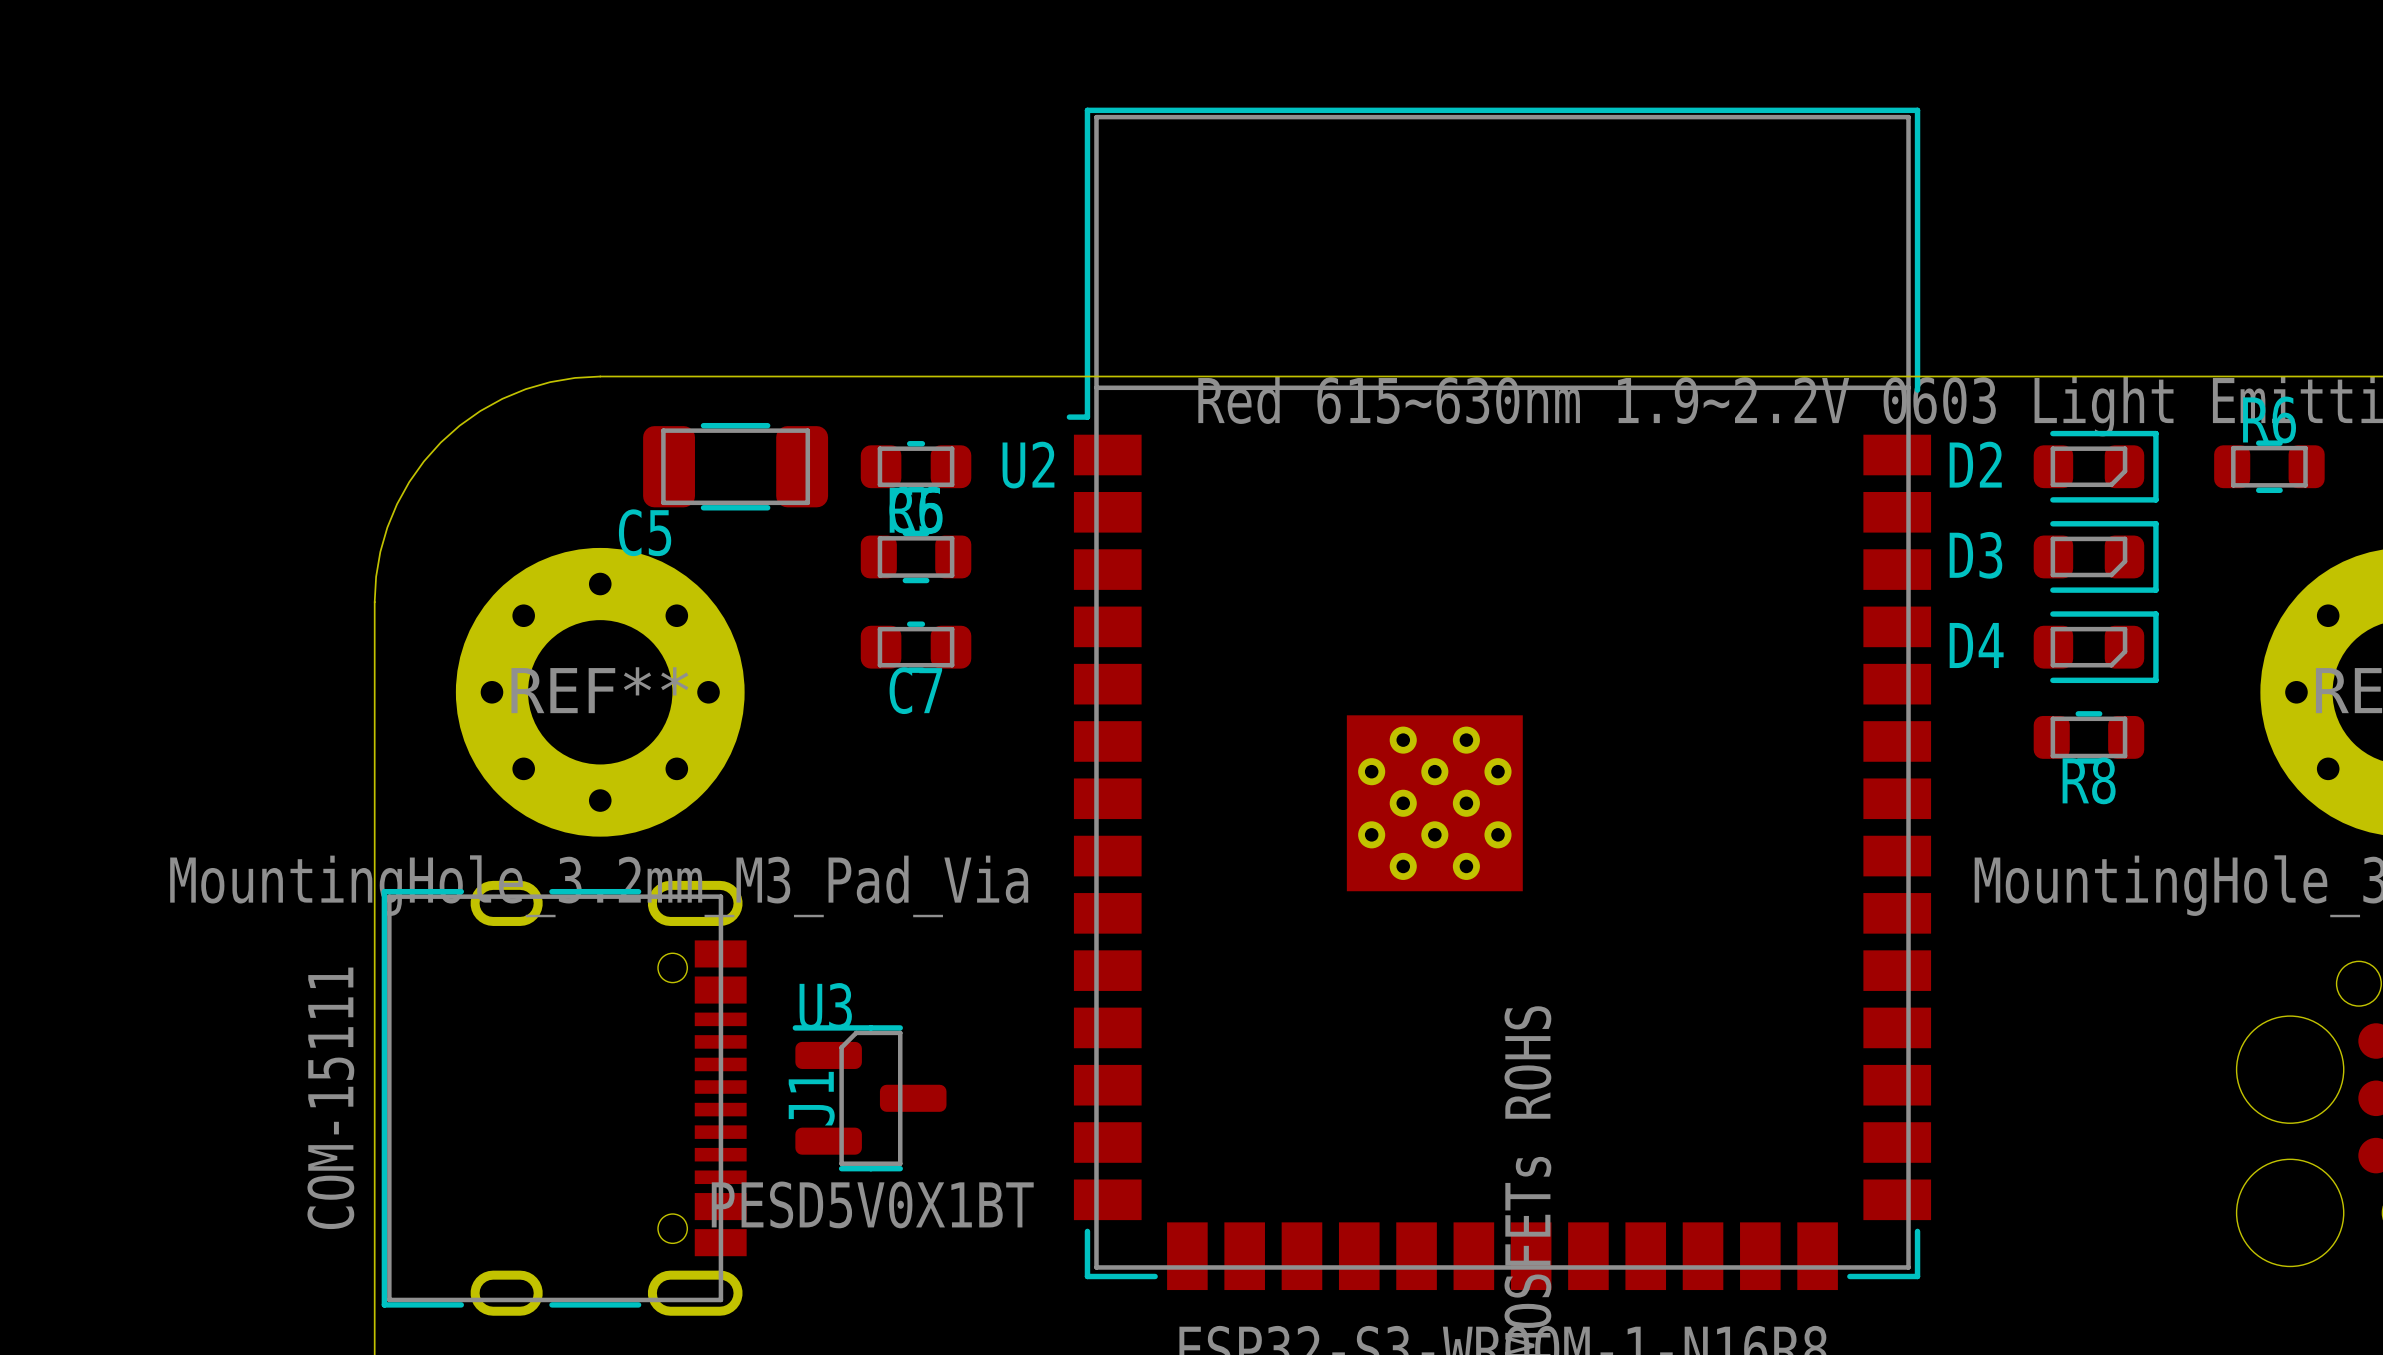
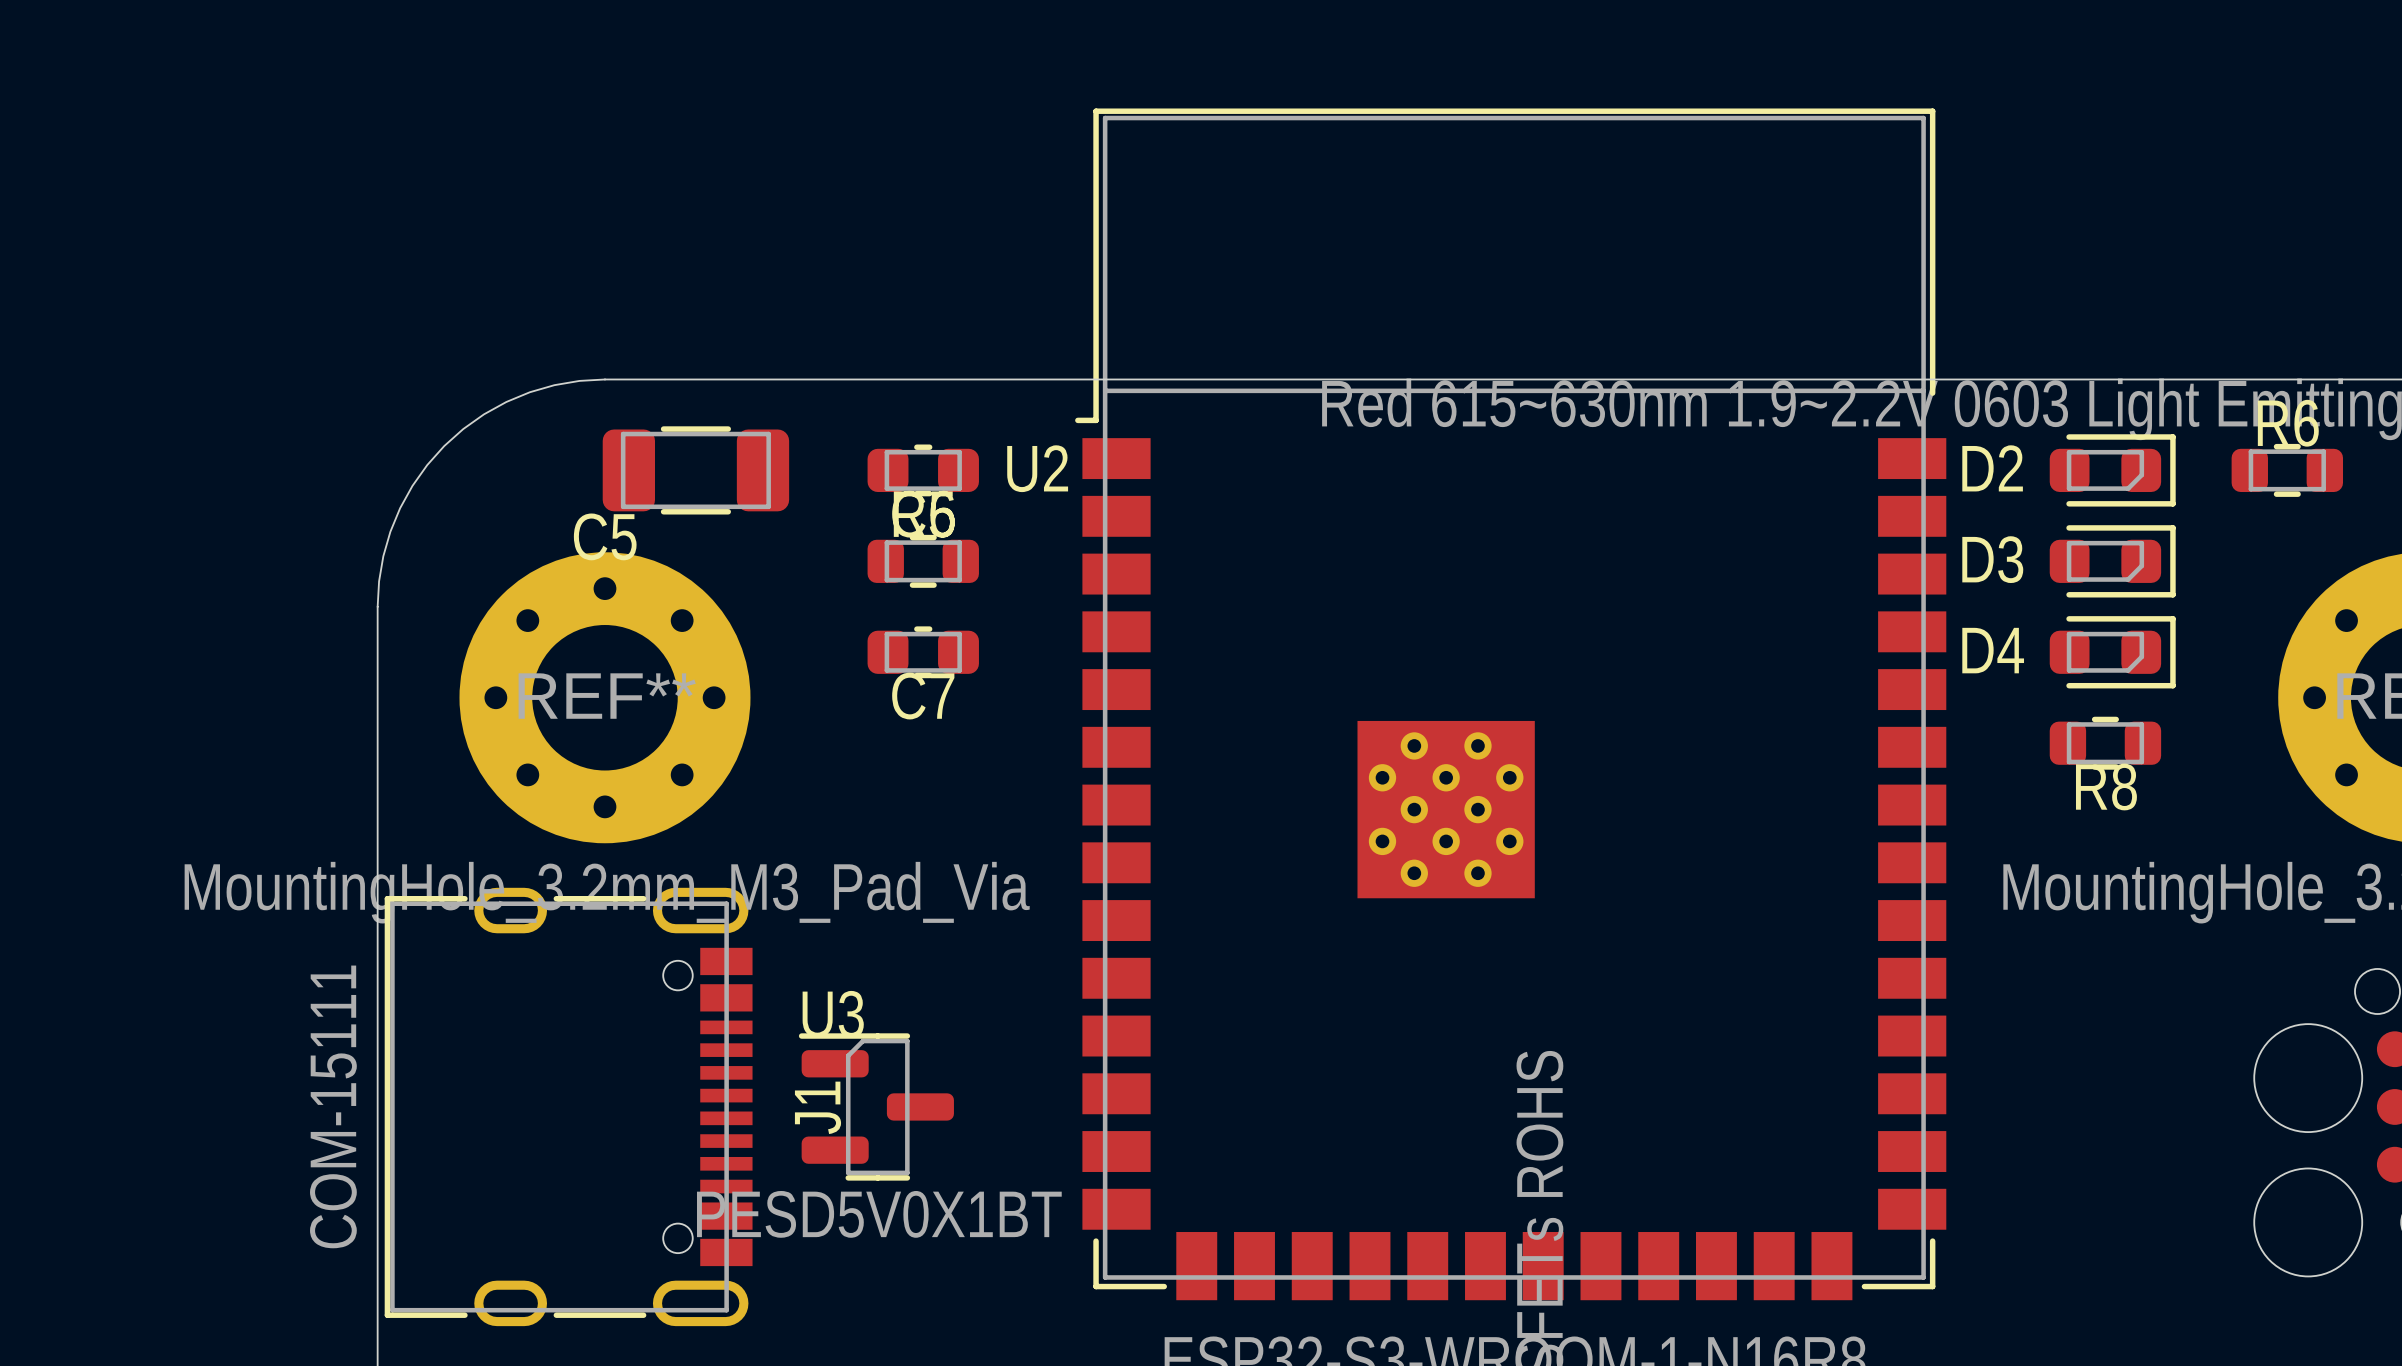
C5 position: (735, 466) -> (695, 470)

